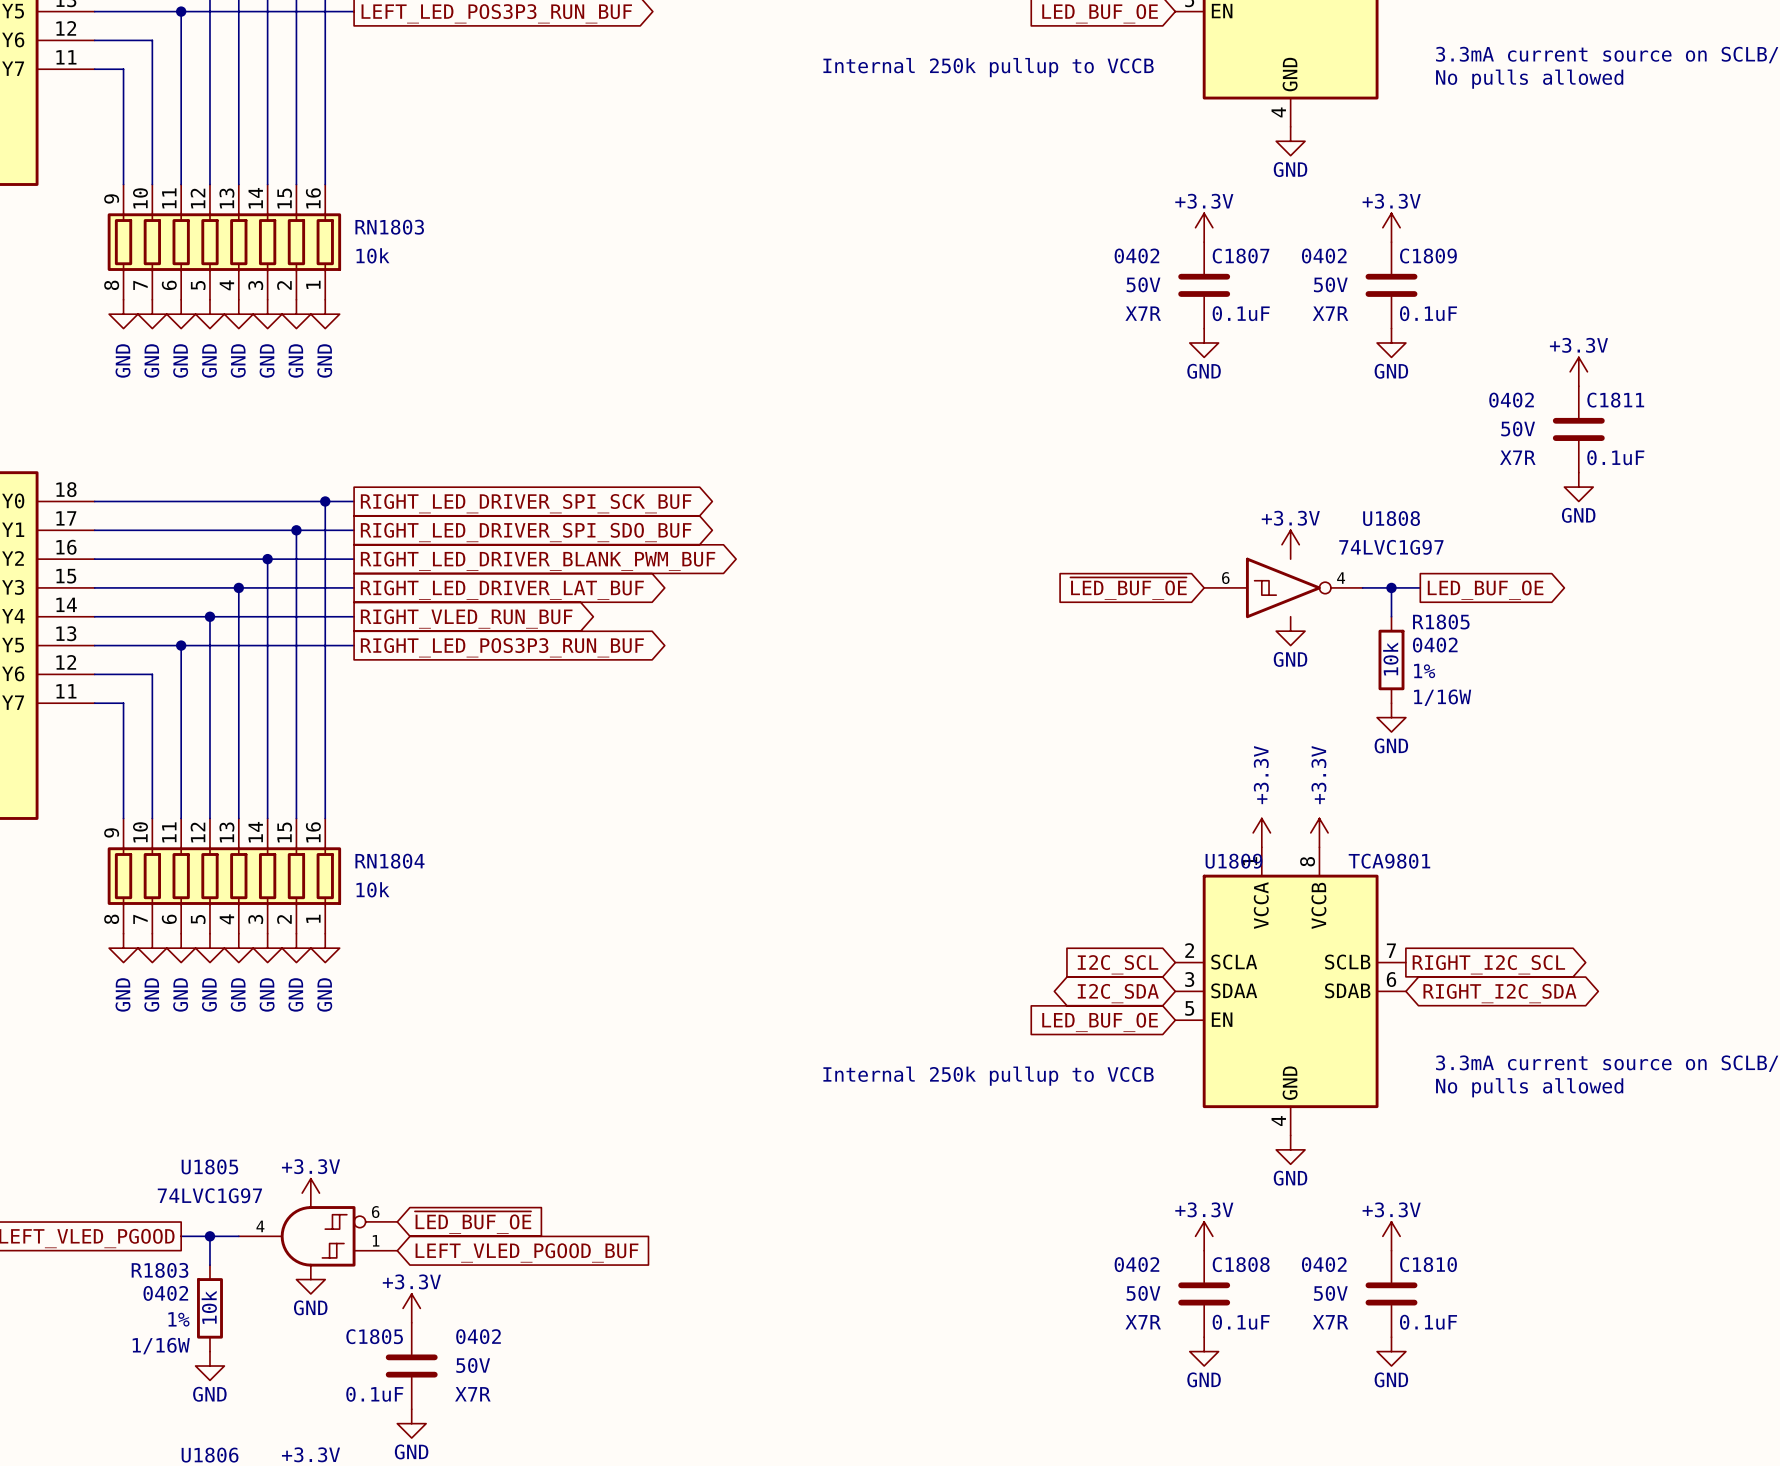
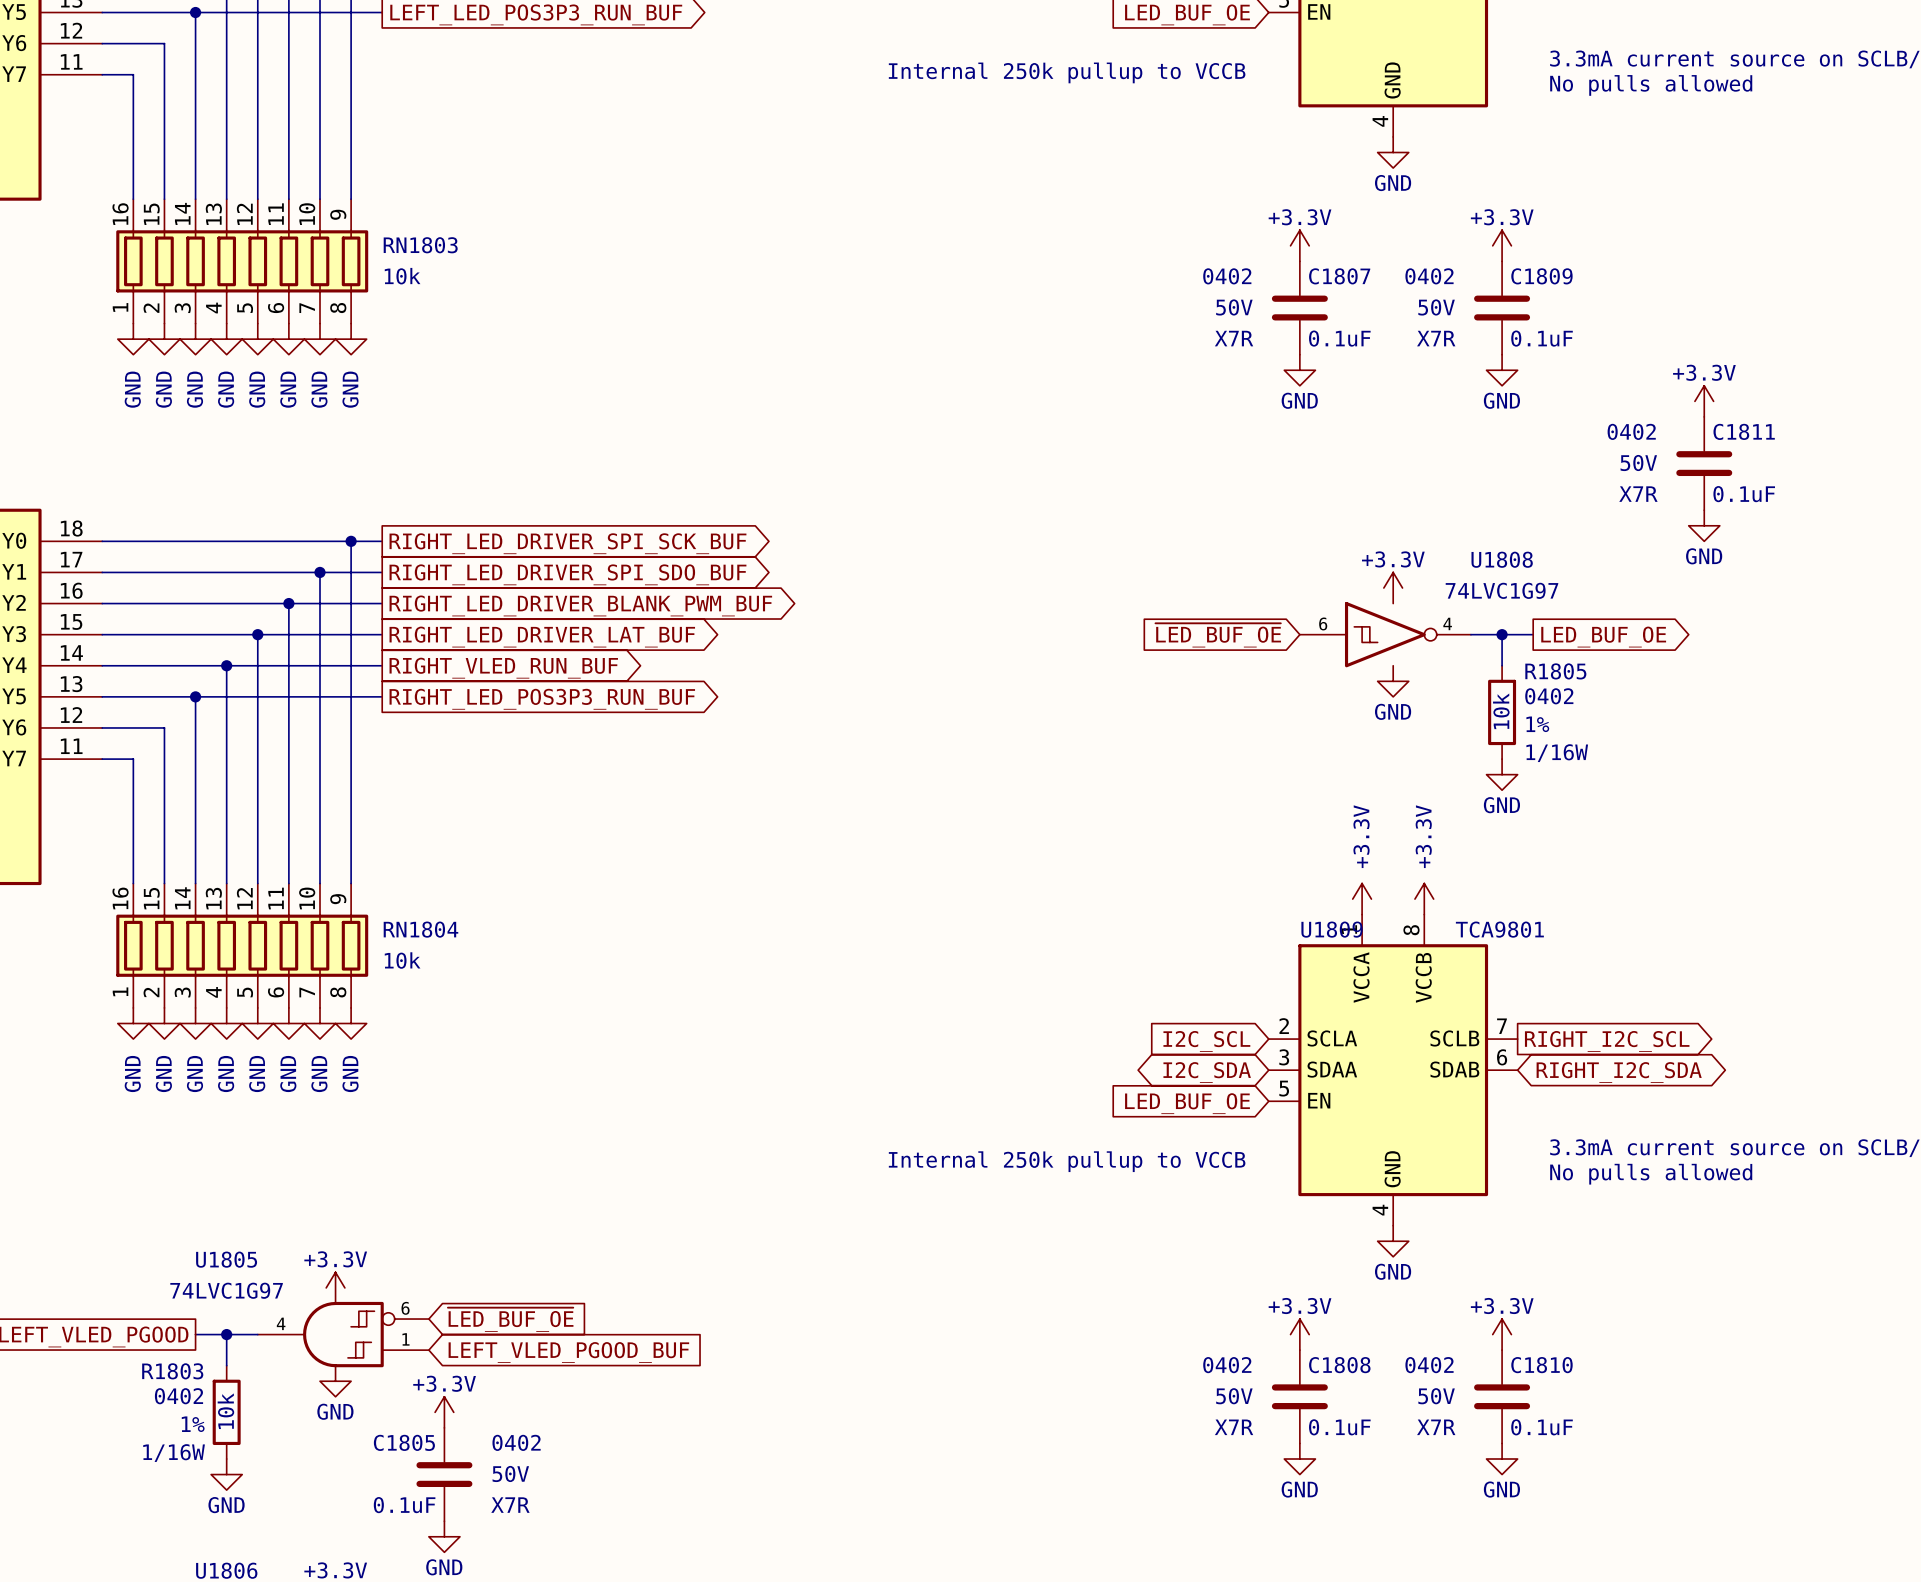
RN1803 flip: as is (224, 242) -> left-right (242, 261)
RN1804 flip: as is (224, 876) -> left-right (242, 945)

